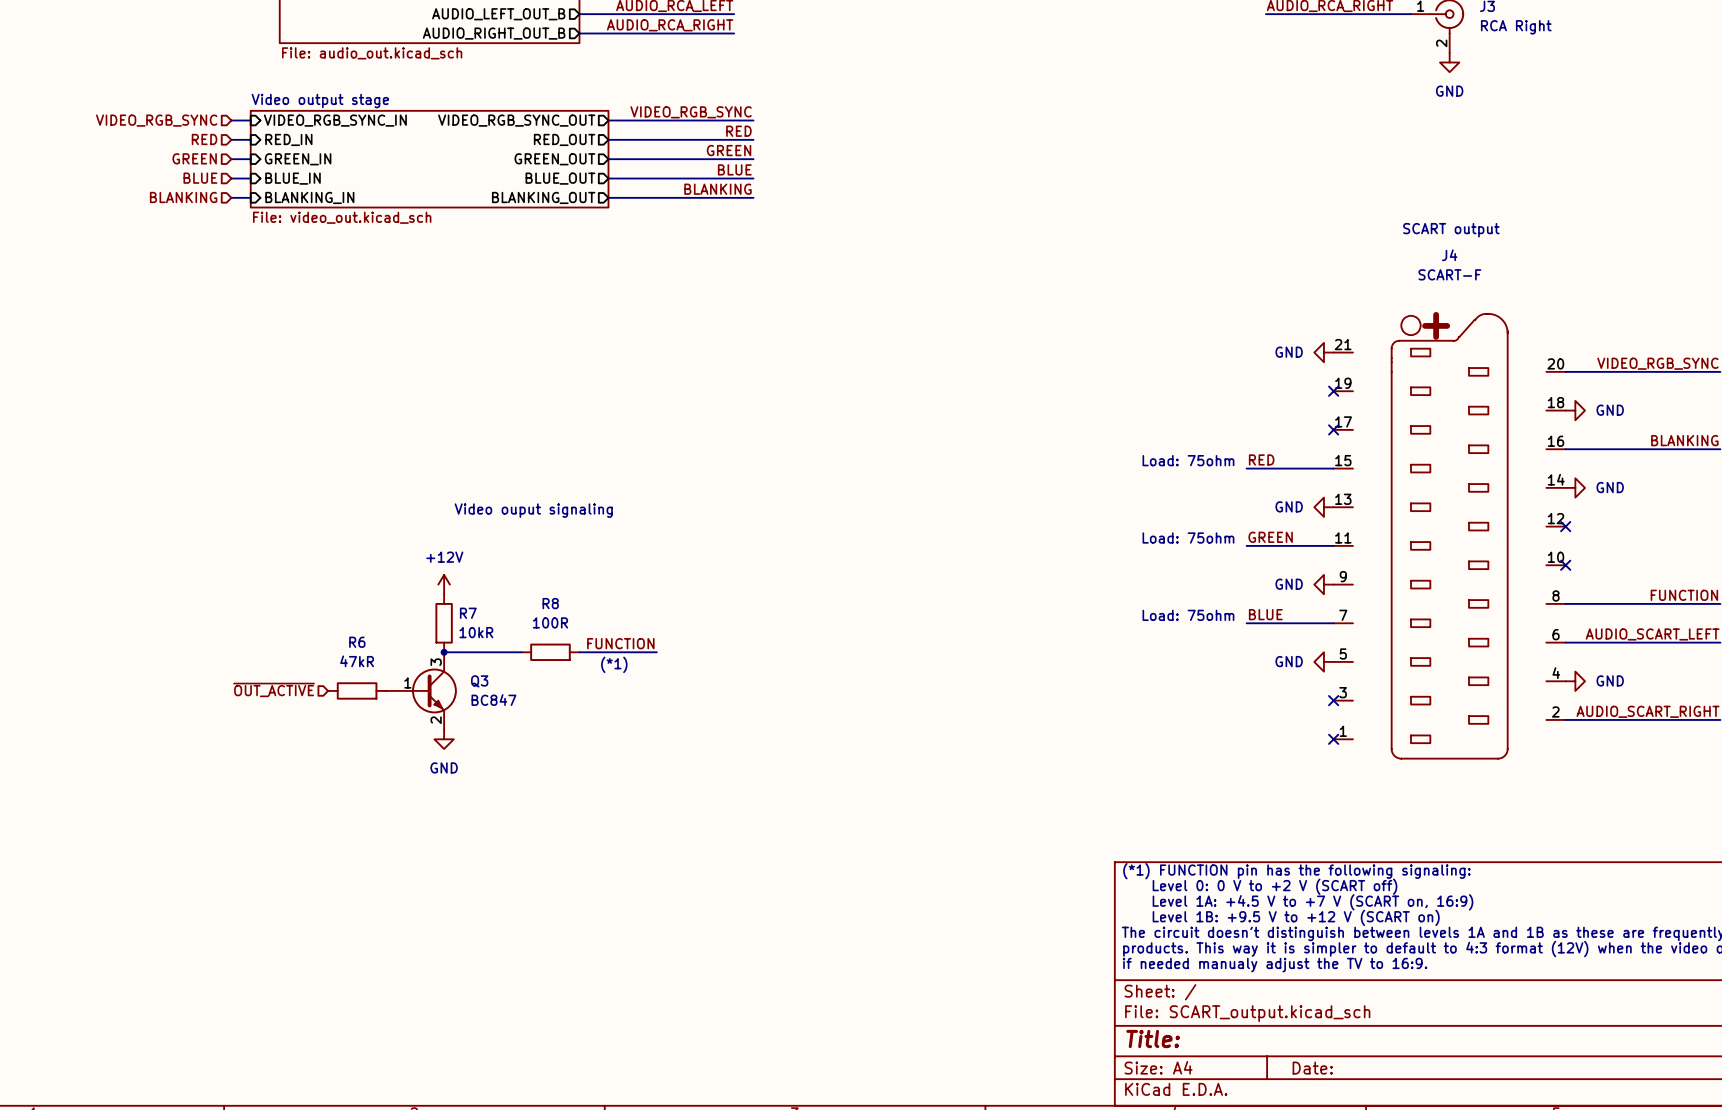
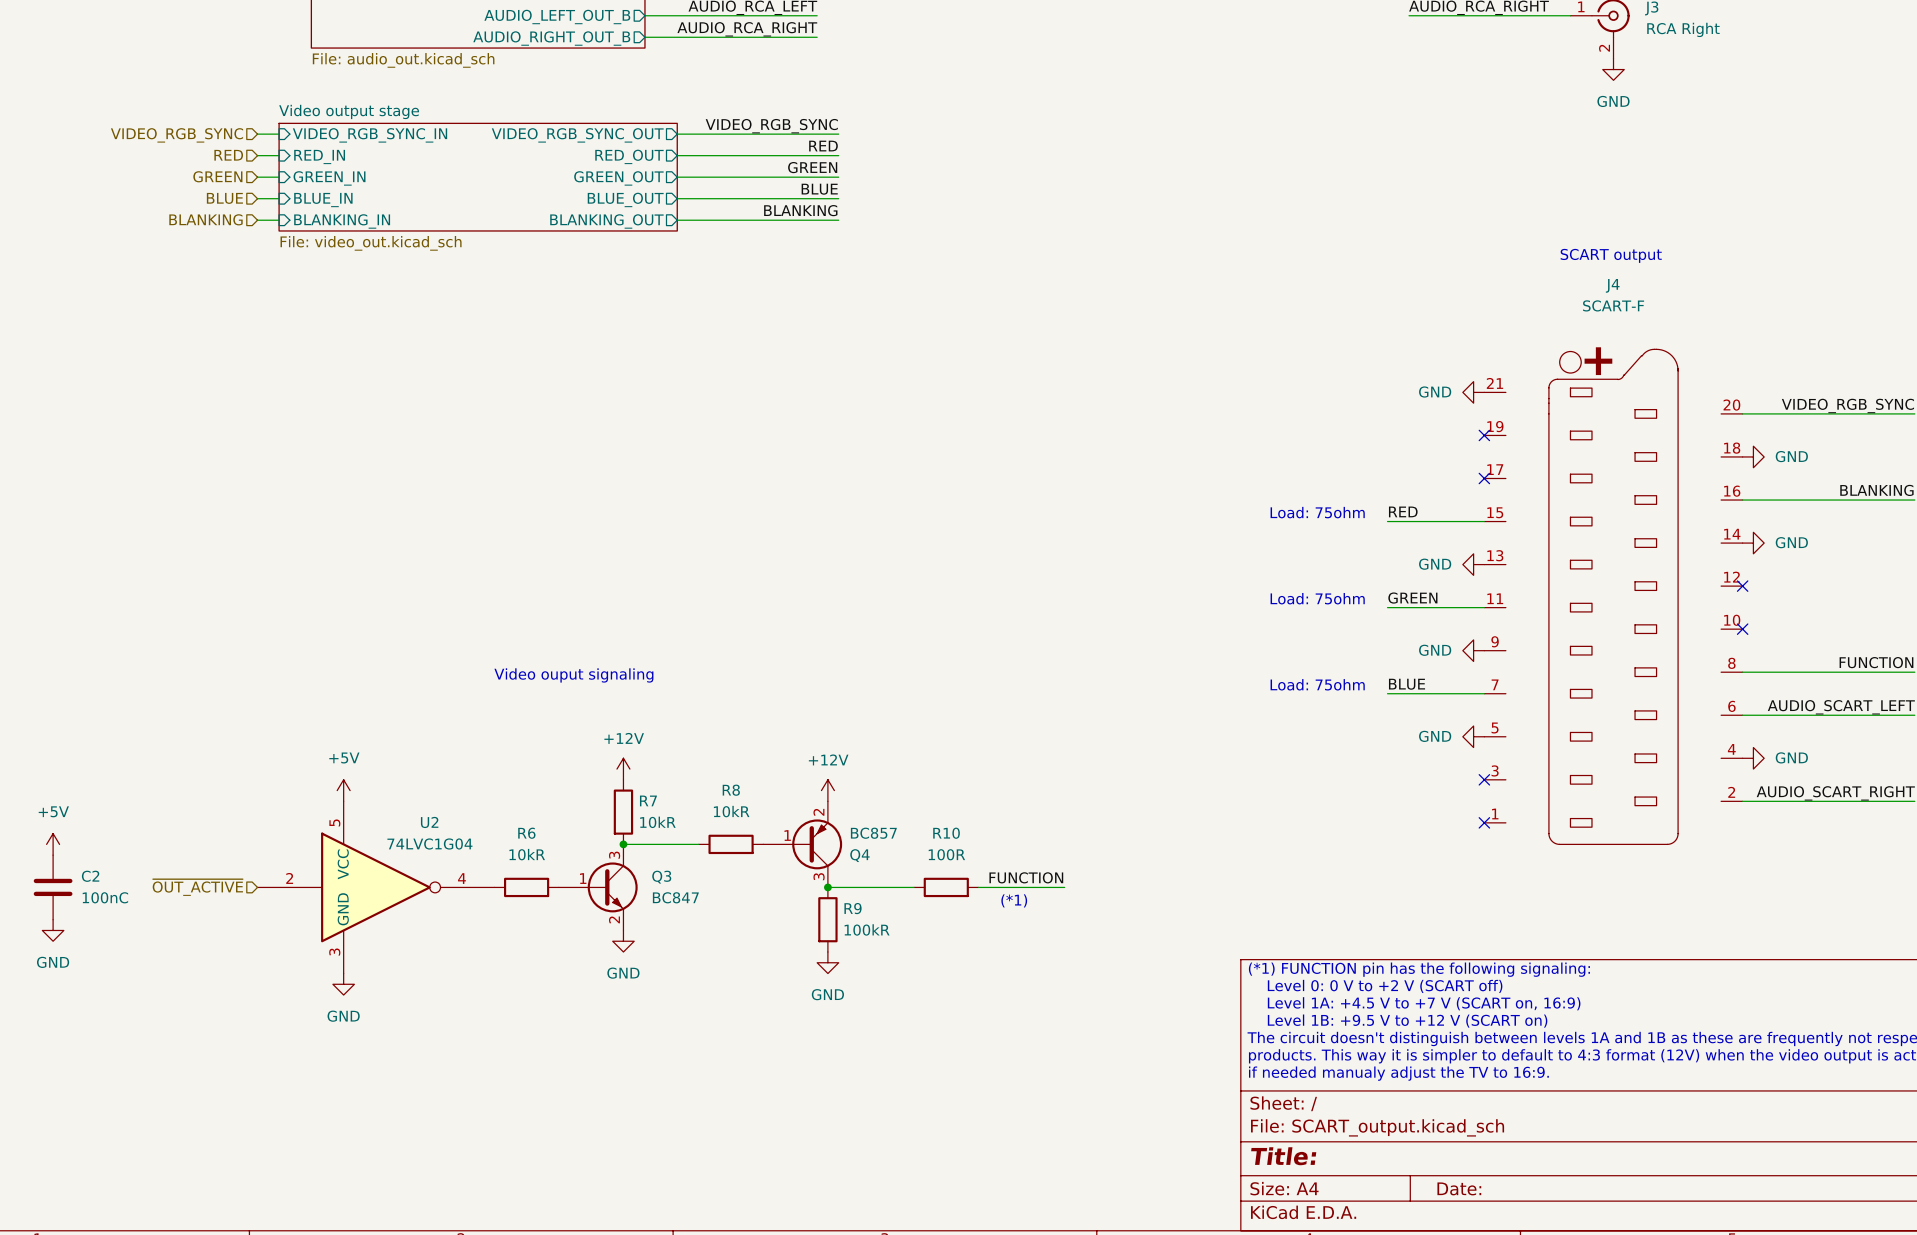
text position: Video ouput signaling (533, 510) -> Video ouput signaling (573, 675)
power symbol position: +12V (444, 584) -> +12V (623, 769)
R8 value: 100R (550, 622) -> 10kR (731, 811)
R7 position: (444, 623) -> (623, 812)
label: FUNCTION (620, 643) -> none
wire: (444, 652) (521, 652) -> none
junction: (444, 652) -> none
R8 position: (550, 652) -> (731, 844)
wire: (579, 652) (656, 652) -> none
R6 value: 47kR (357, 661) -> 10kR (527, 854)
text: (*1) (614, 664) -> none
hierarchical label position: ~{OUT_ACTIVE} (274, 689) -> ~{OUT_ACTIVE} (197, 887)
R6 position: (357, 690) -> (526, 887)
Q3 position: (421, 690) -> (598, 887)
power symbol: none -> +5V (343, 790)
power symbol: none -> +12V (827, 790)
power symbol: GND (444, 739) -> none
power symbol: none -> +5V (53, 844)
wire: none -> (623, 844) (698, 844)
junction: none -> (623, 844)
Q4: none -> BC857 (802, 844)
label: none -> FUNCTION (1026, 877)
C2: none -> 100nC (53, 887)
U2: none -> 74LVC1G04 (375, 887)
wire: none -> (827, 887) (914, 887)
junction: none -> (827, 887)
R10: none -> 100R (946, 887)
wire: none -> (978, 887) (1064, 887)
text: none -> (*1) (1014, 900)
R9: none -> 100kR (827, 919)
power symbol: none -> GND (53, 930)
power symbol: none -> GND (623, 941)
power symbol: none -> GND (827, 962)
power symbol: none -> GND (343, 984)

